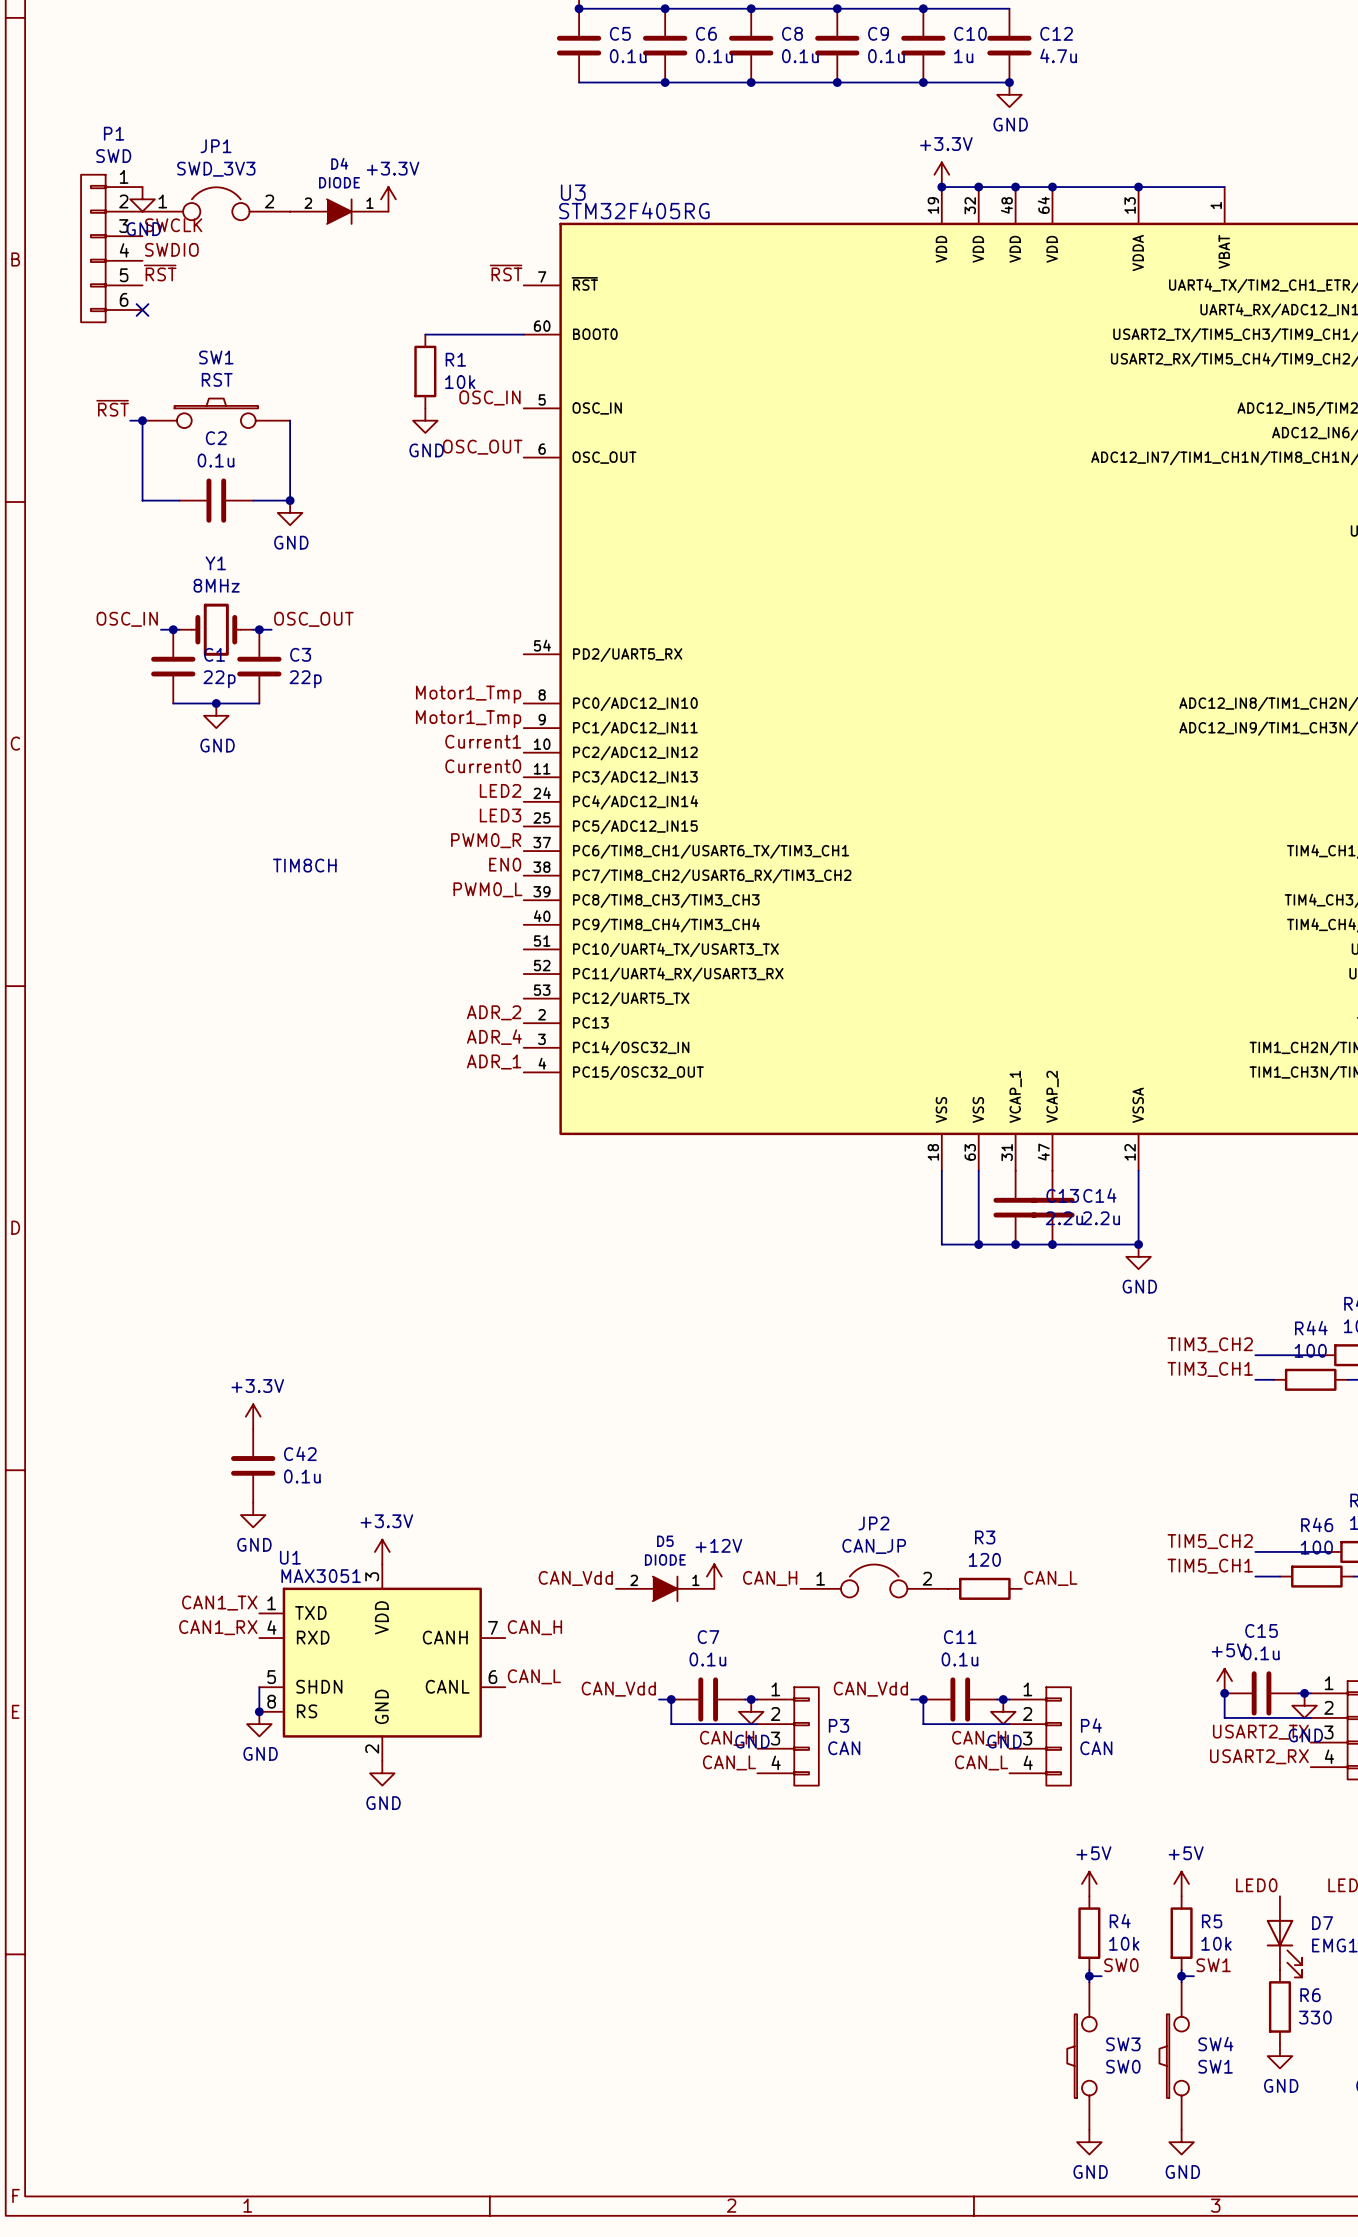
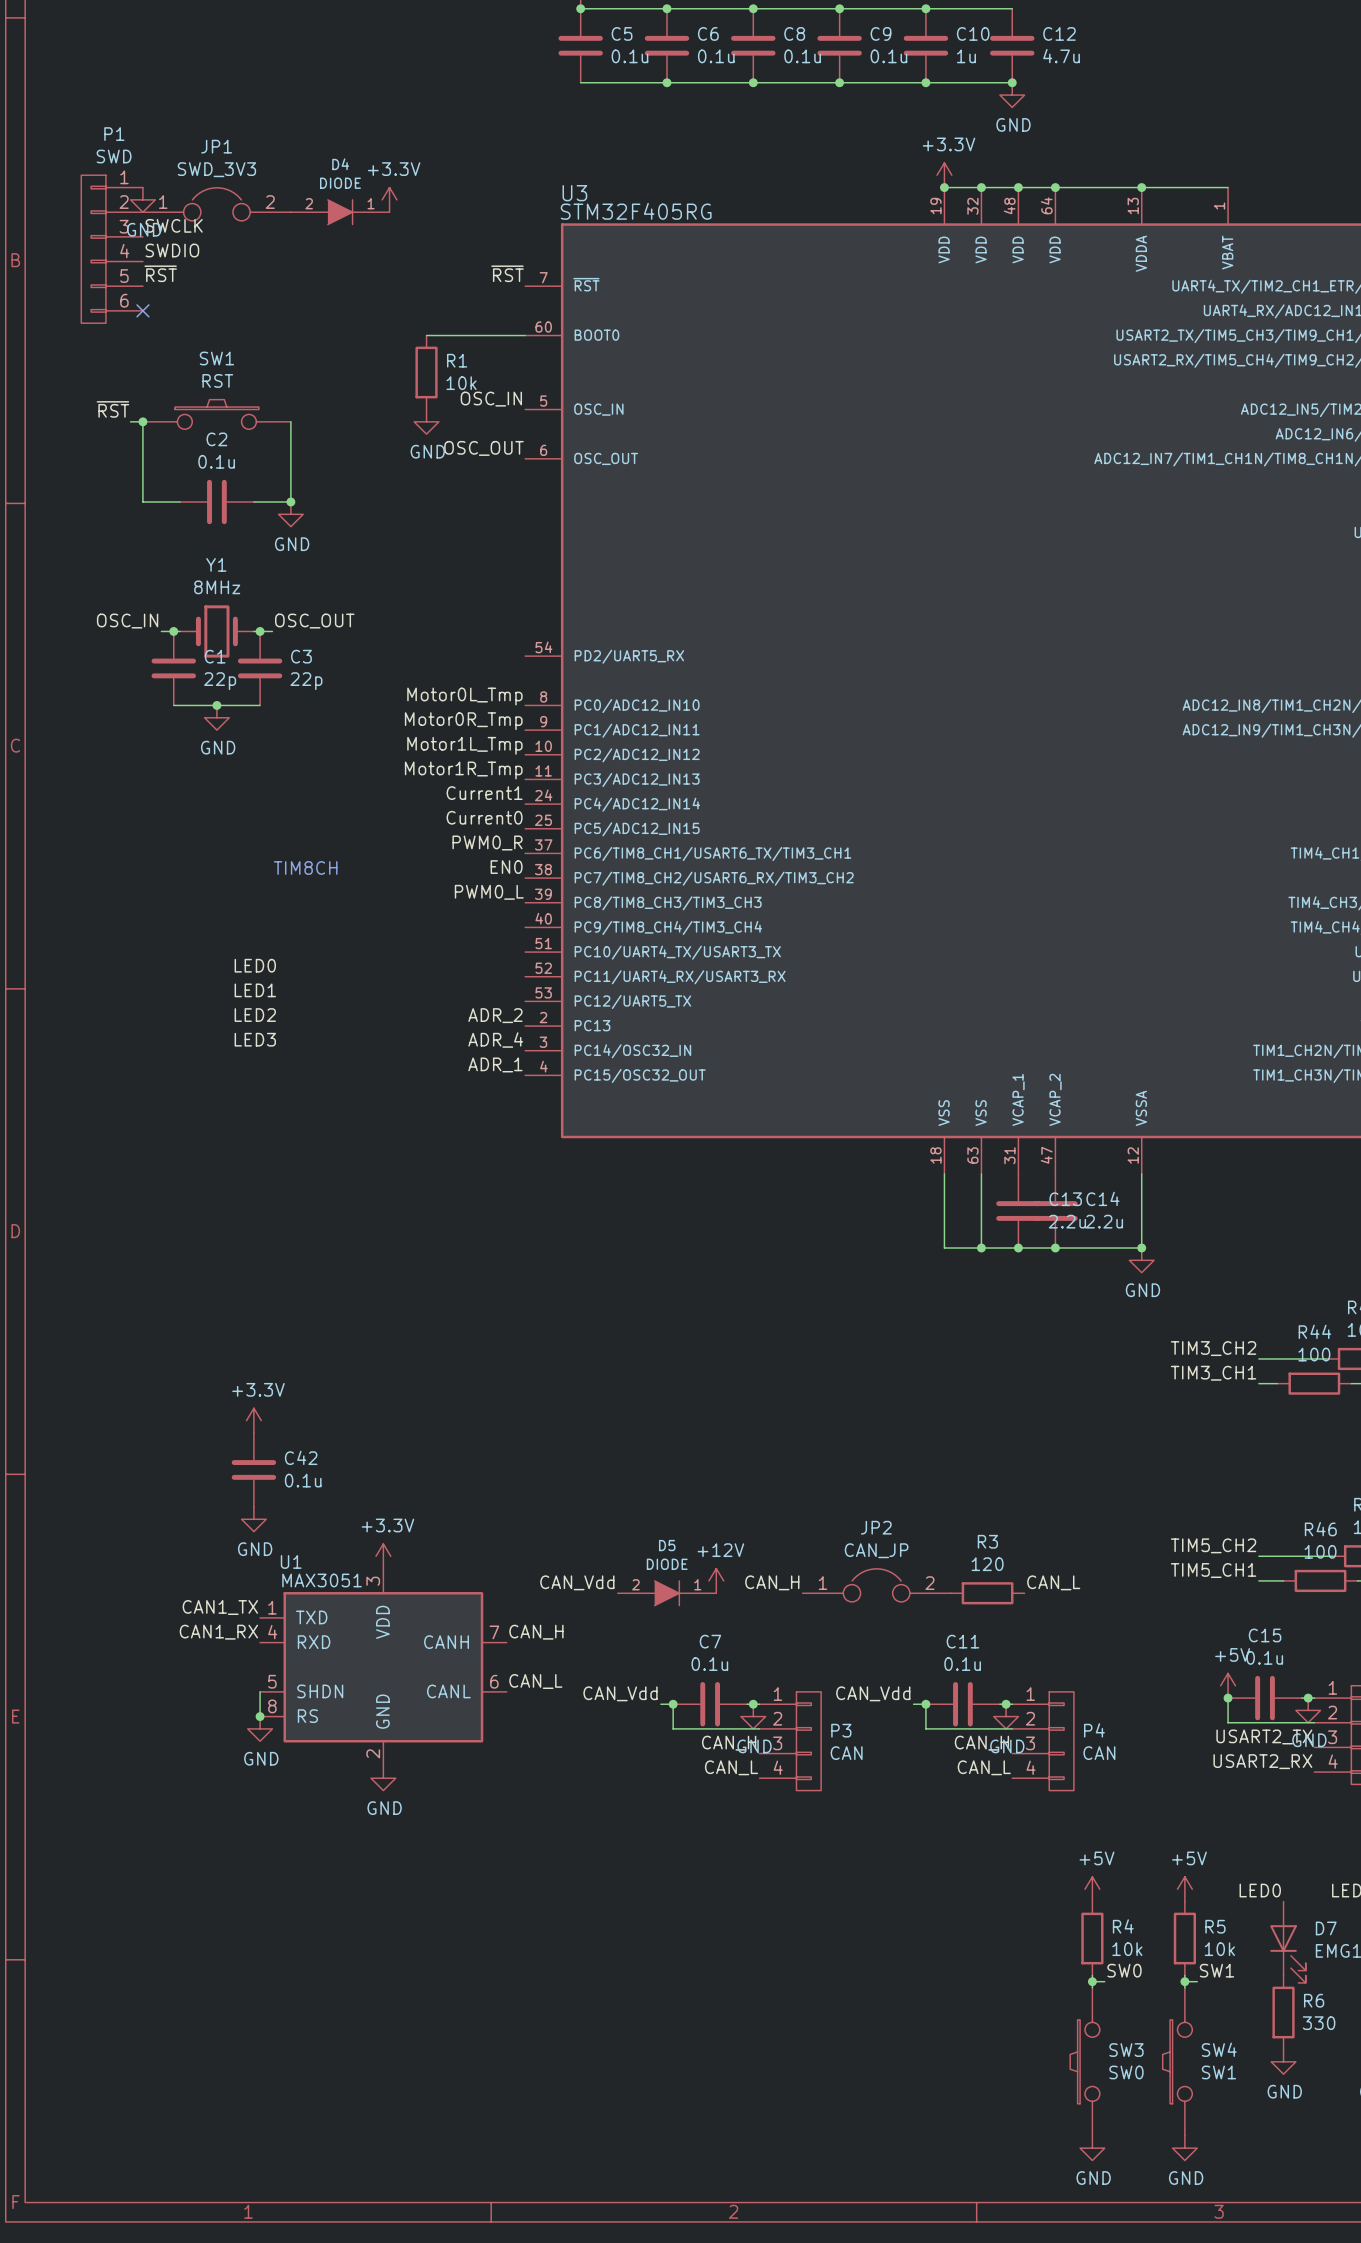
label: Motor1_Tmp (468, 694) -> Motor0L_Tmp (464, 696)
label: Motor1_Tmp (468, 719) -> Motor0R_Tmp (463, 721)
label: Current1 (483, 741) -> Motor1L_Tmp (464, 745)
label: Current0 (483, 766) -> Motor1R_Tmp (463, 770)
label: LED2 (500, 790) -> Current1 (484, 793)
label: LED3 (500, 815) -> Current0 (484, 817)
label: none -> LED0 (255, 965)
label: none -> LED1 (255, 990)
label: none -> LED2 (255, 1015)
label: none -> LED3 (255, 1039)

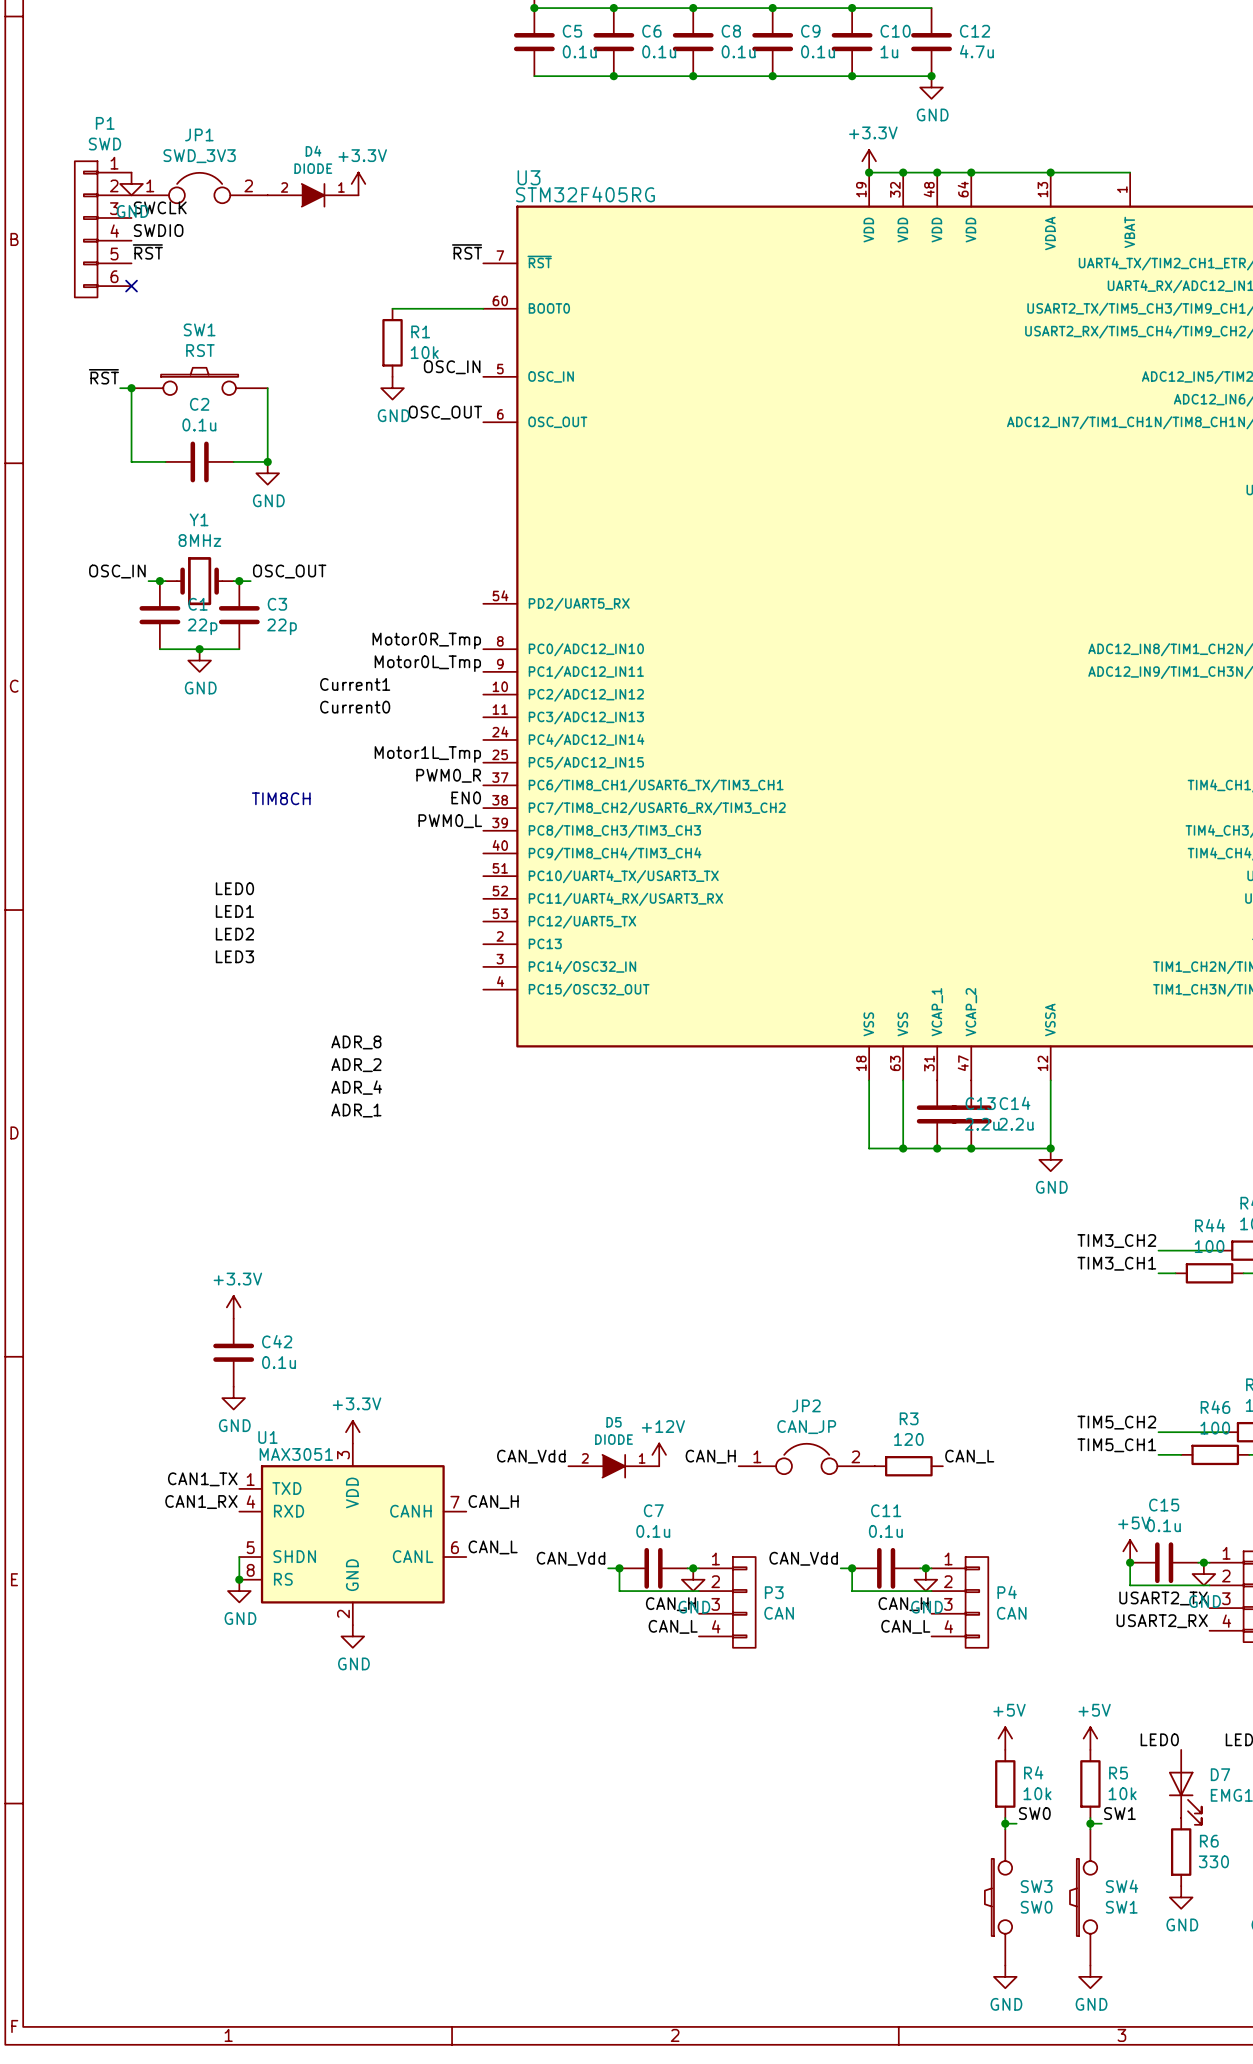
label: Motor0L_Tmp (464, 696) -> Motor0R_Tmp (426, 640)
label: Motor0R_Tmp (463, 721) -> Motor0L_Tmp (427, 663)
label: Motor1L_Tmp (464, 745) -> none
label: none -> Current0 (355, 707)
label: Motor1R_Tmp (463, 770) -> none
label position: Current1 (484, 793) -> Current1 (355, 684)
label: Current0 (484, 817) -> Motor1L_Tmp (427, 754)
label position: ADR_2 (495, 1015) -> ADR_2 (356, 1065)
label position: ADR_4 (495, 1040) -> ADR_4 (356, 1087)
label position: ADR_1 (495, 1064) -> ADR_1 (356, 1110)
label: none -> ADR_8 (356, 1042)

